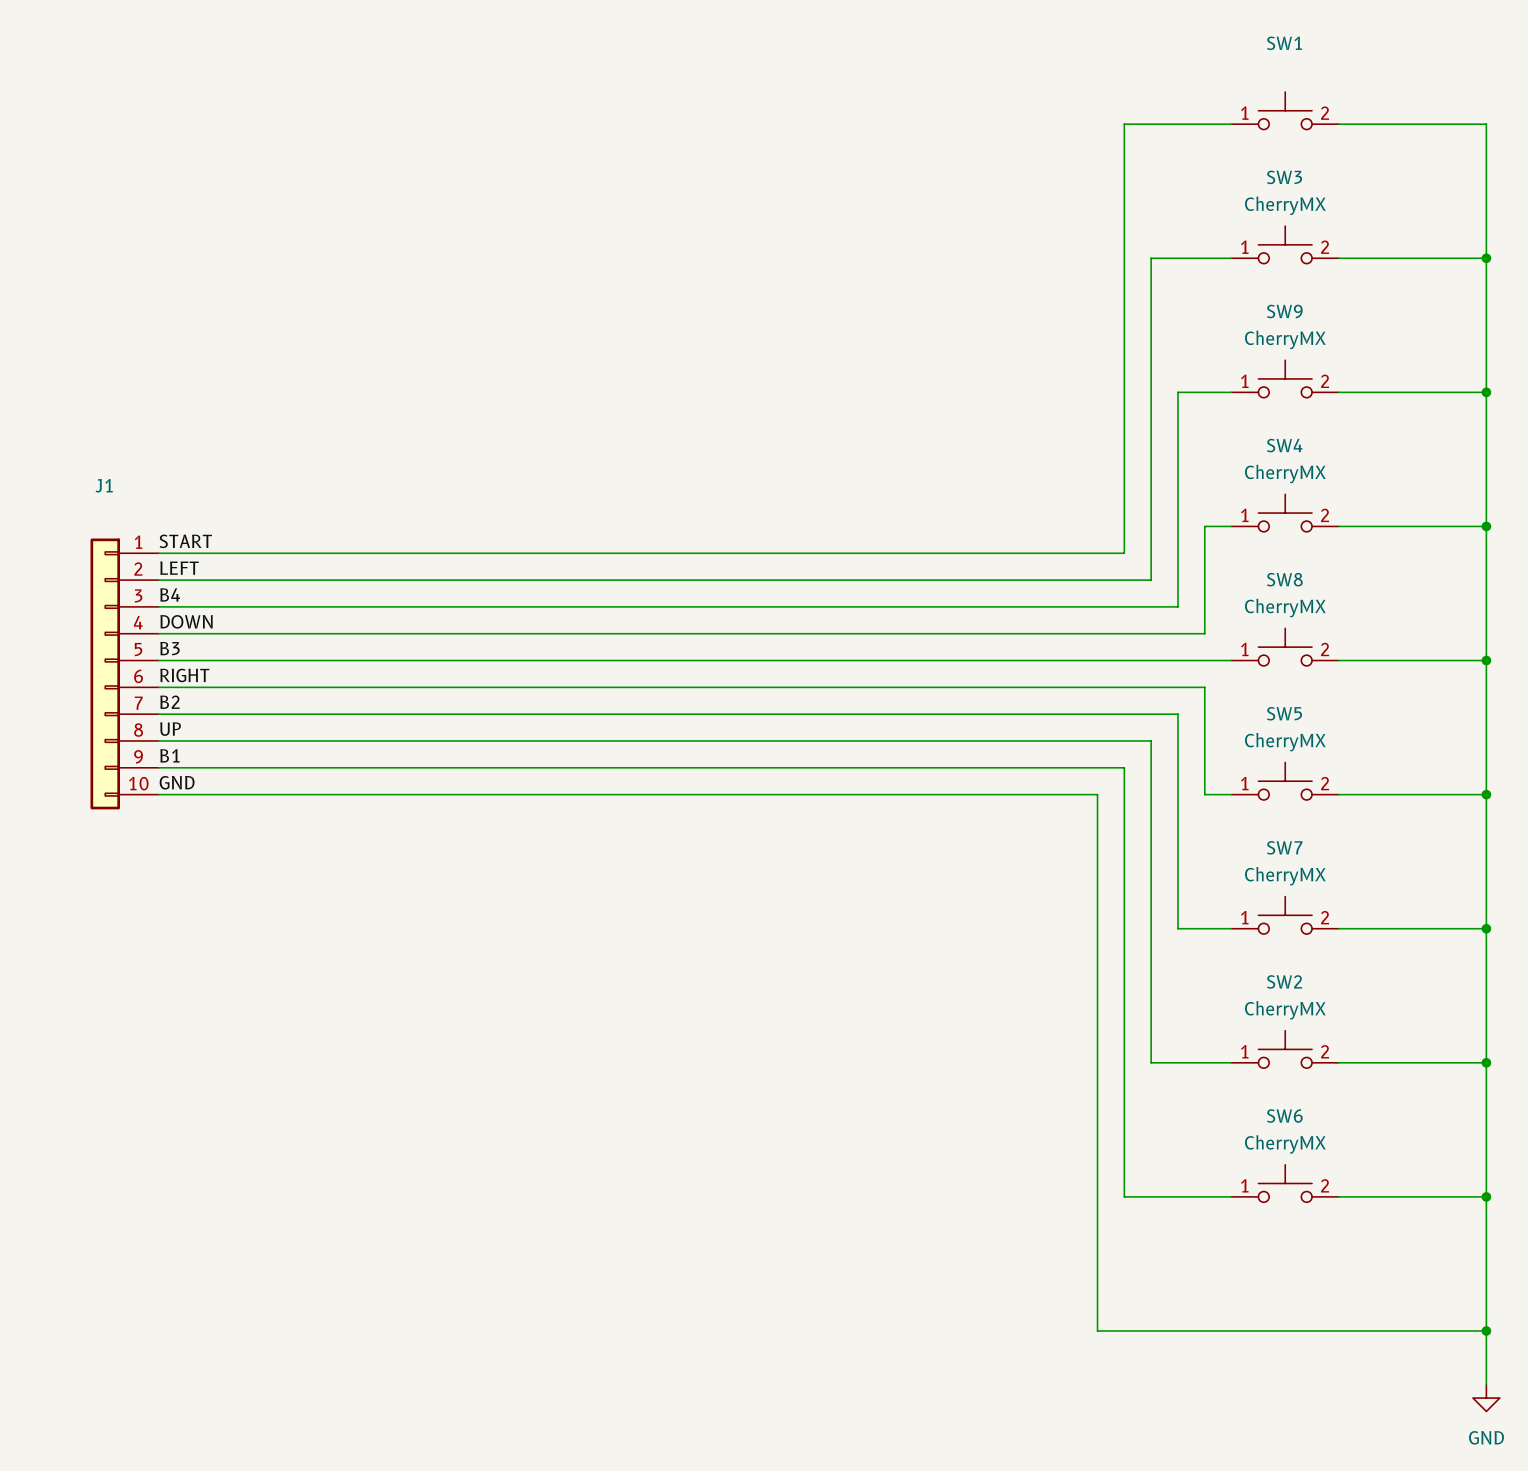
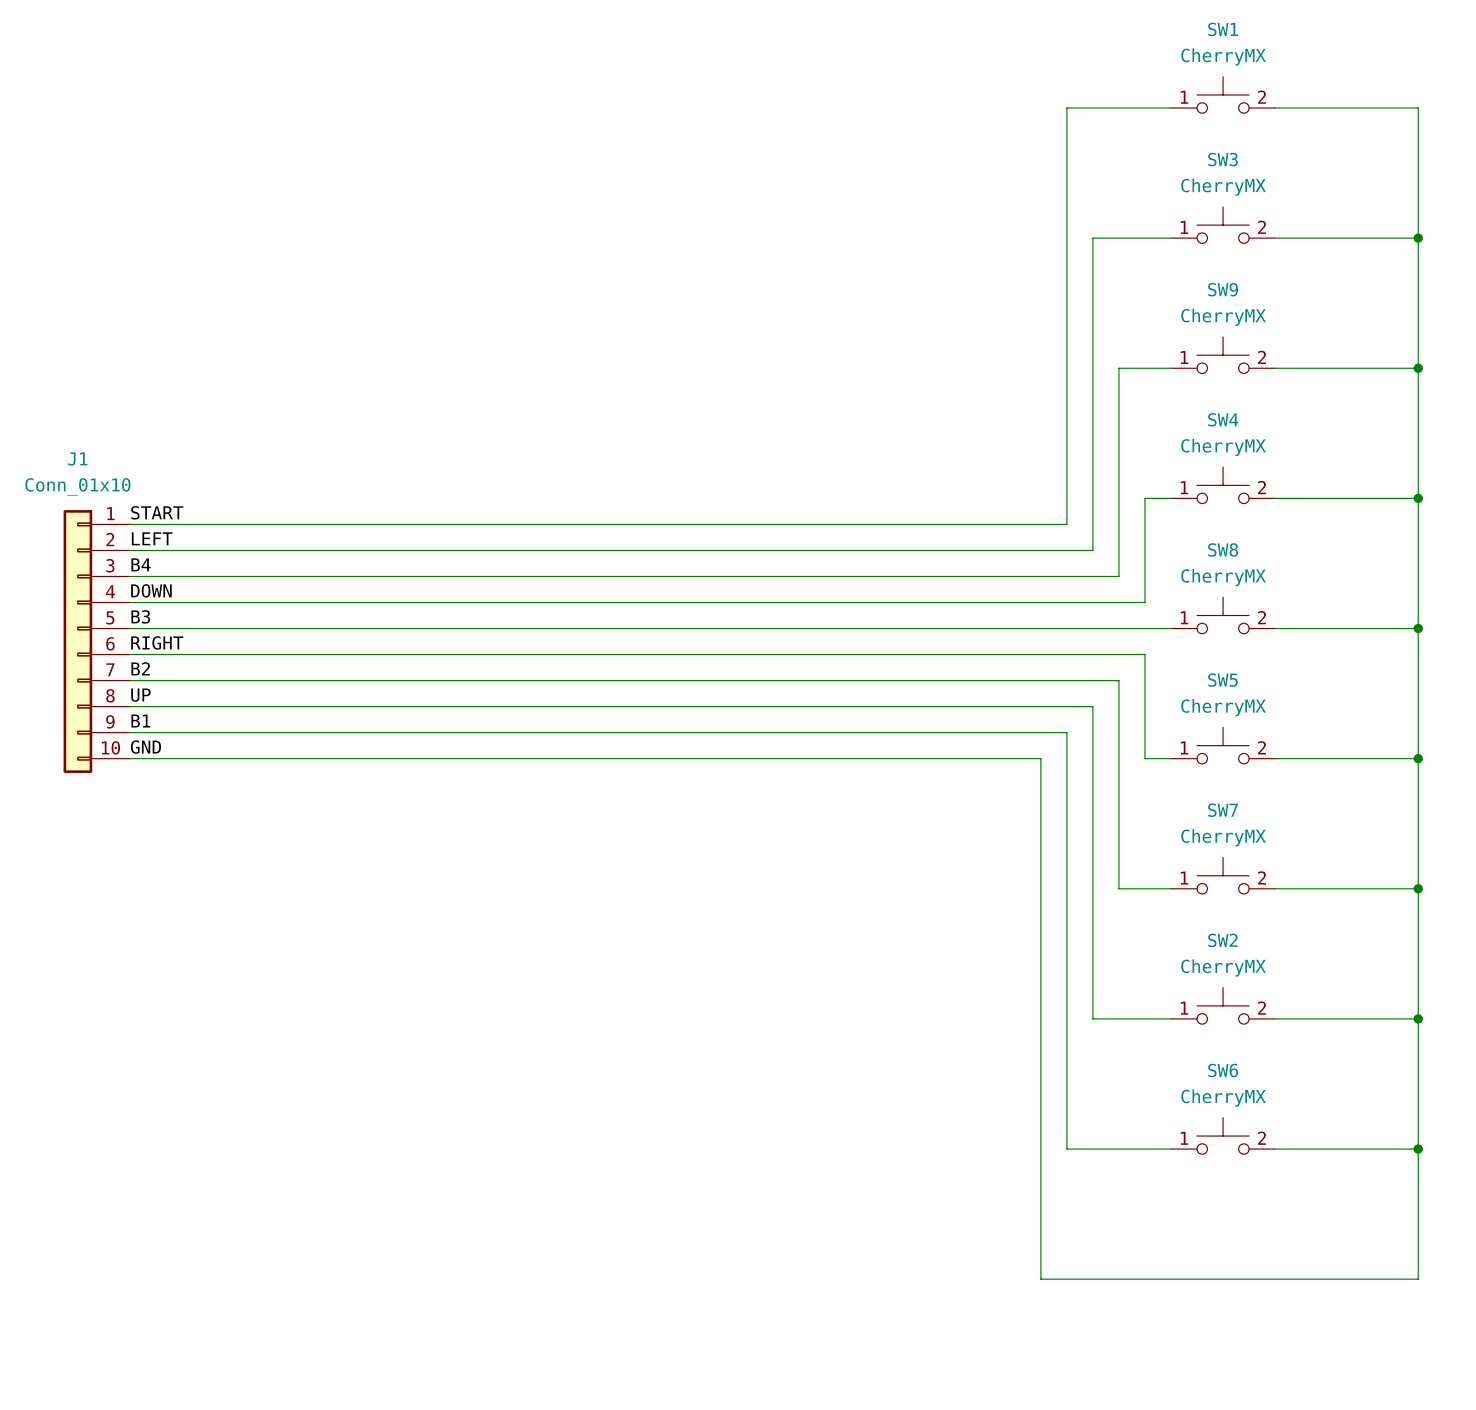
SW1 value: none -> CherryMX (1223, 57)
J1 value: none -> Conn_01x10 (77, 486)
wire: (1486, 1330) (1486, 1384) -> none
junction: (1486, 1330) -> none
power symbol: GND (1486, 1398) -> none

